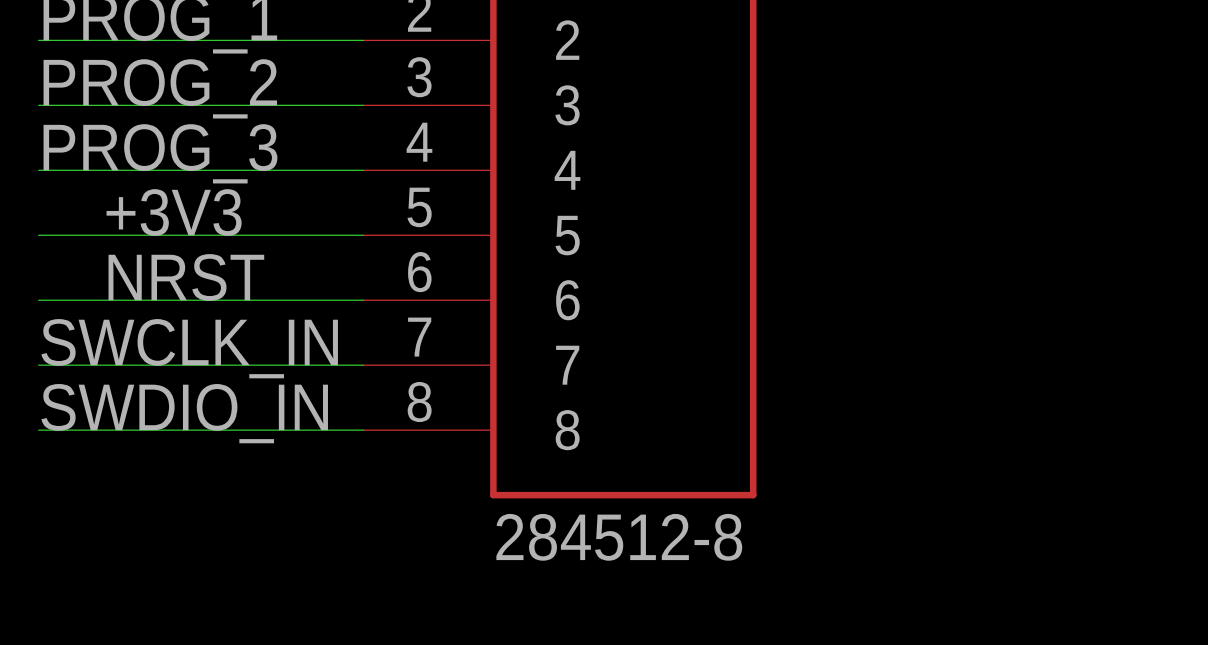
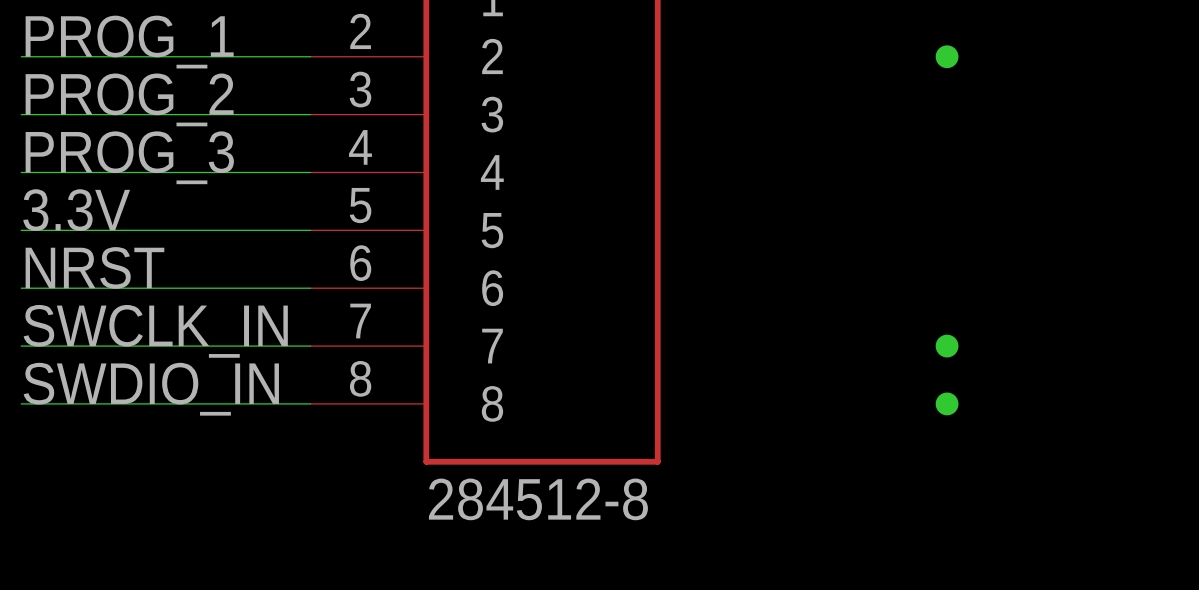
junction: none -> (947, 56)
label: none -> 3.3V (76, 210)
label: +3V3 (174, 212) -> none
label position: NRST (186, 277) -> NRST (94, 267)
junction: none -> (947, 346)
junction: none -> (947, 403)

